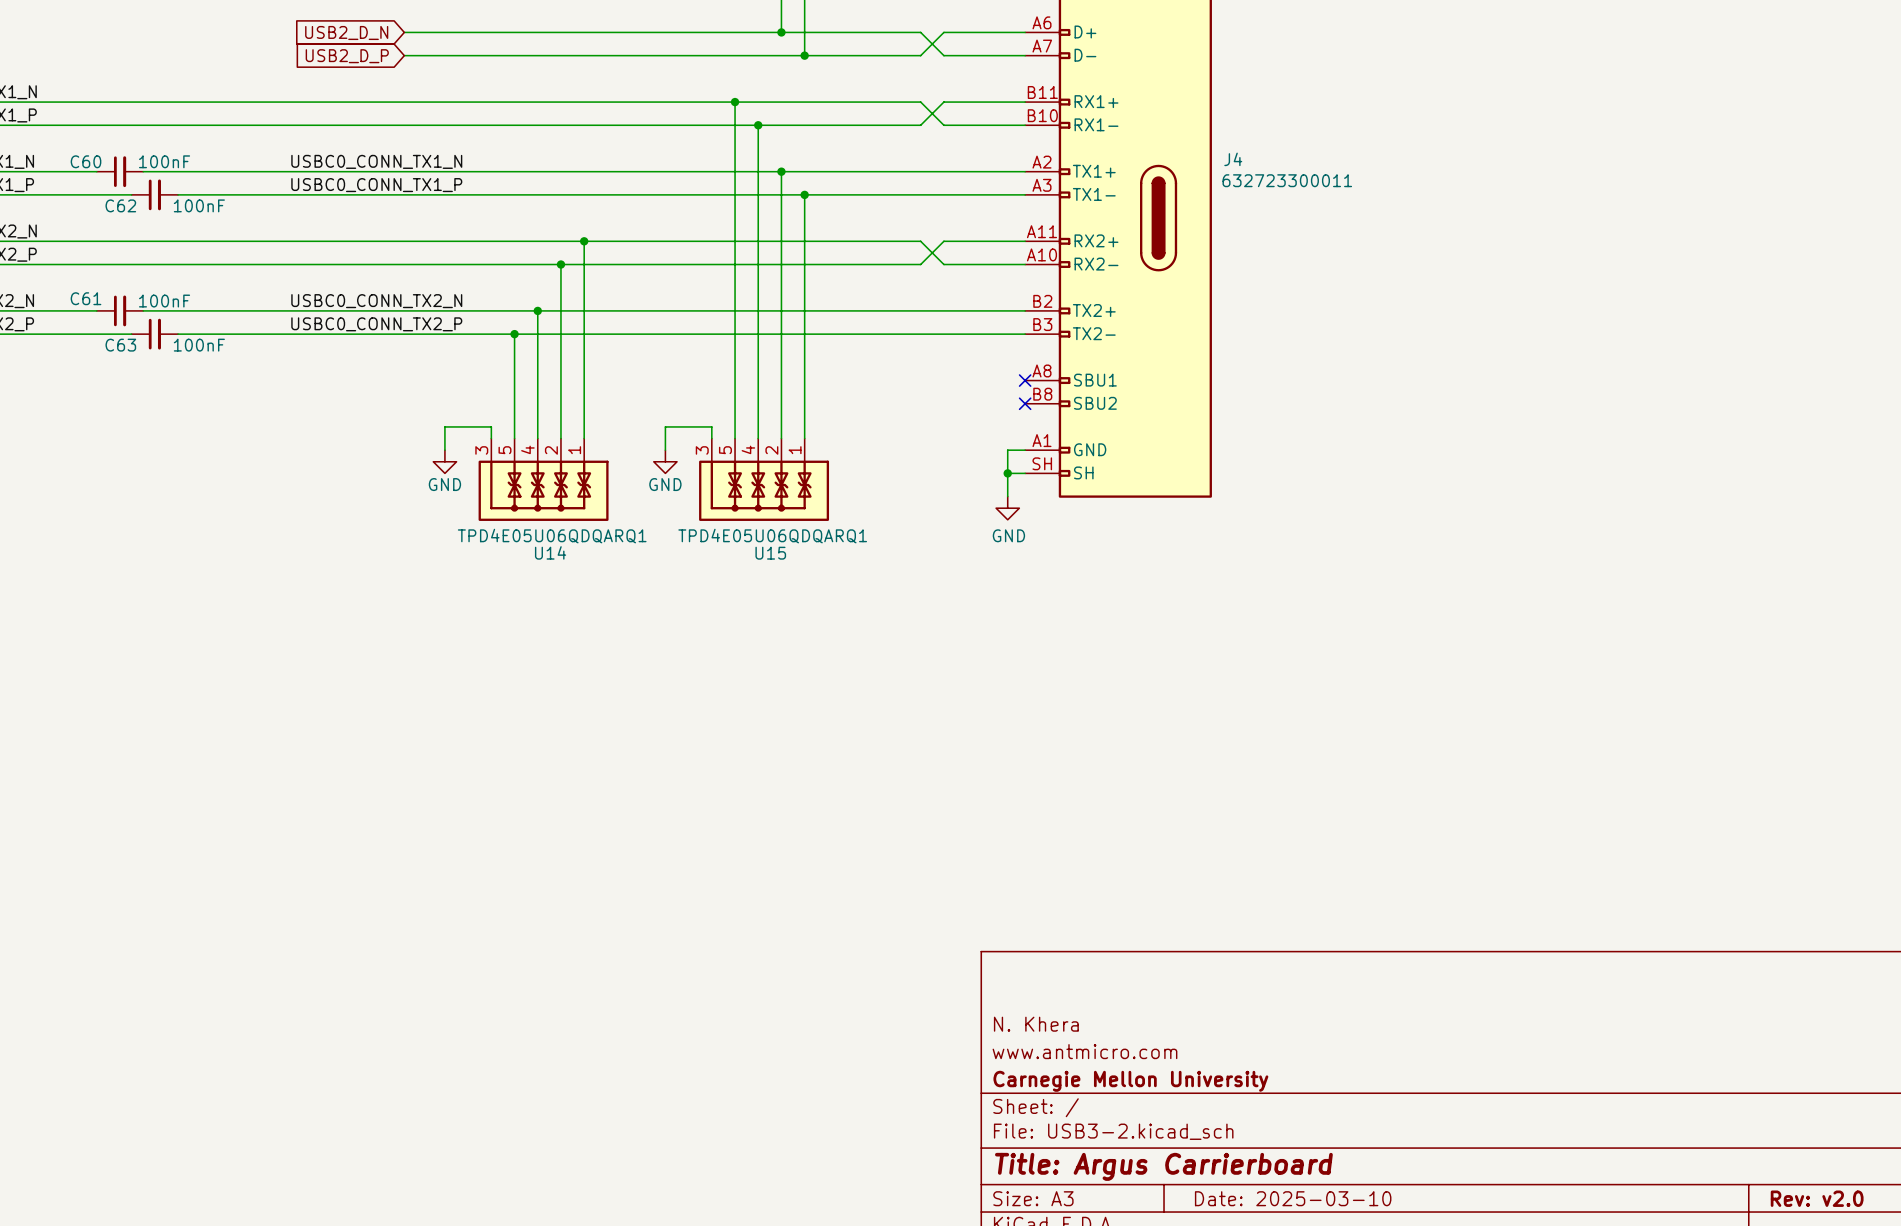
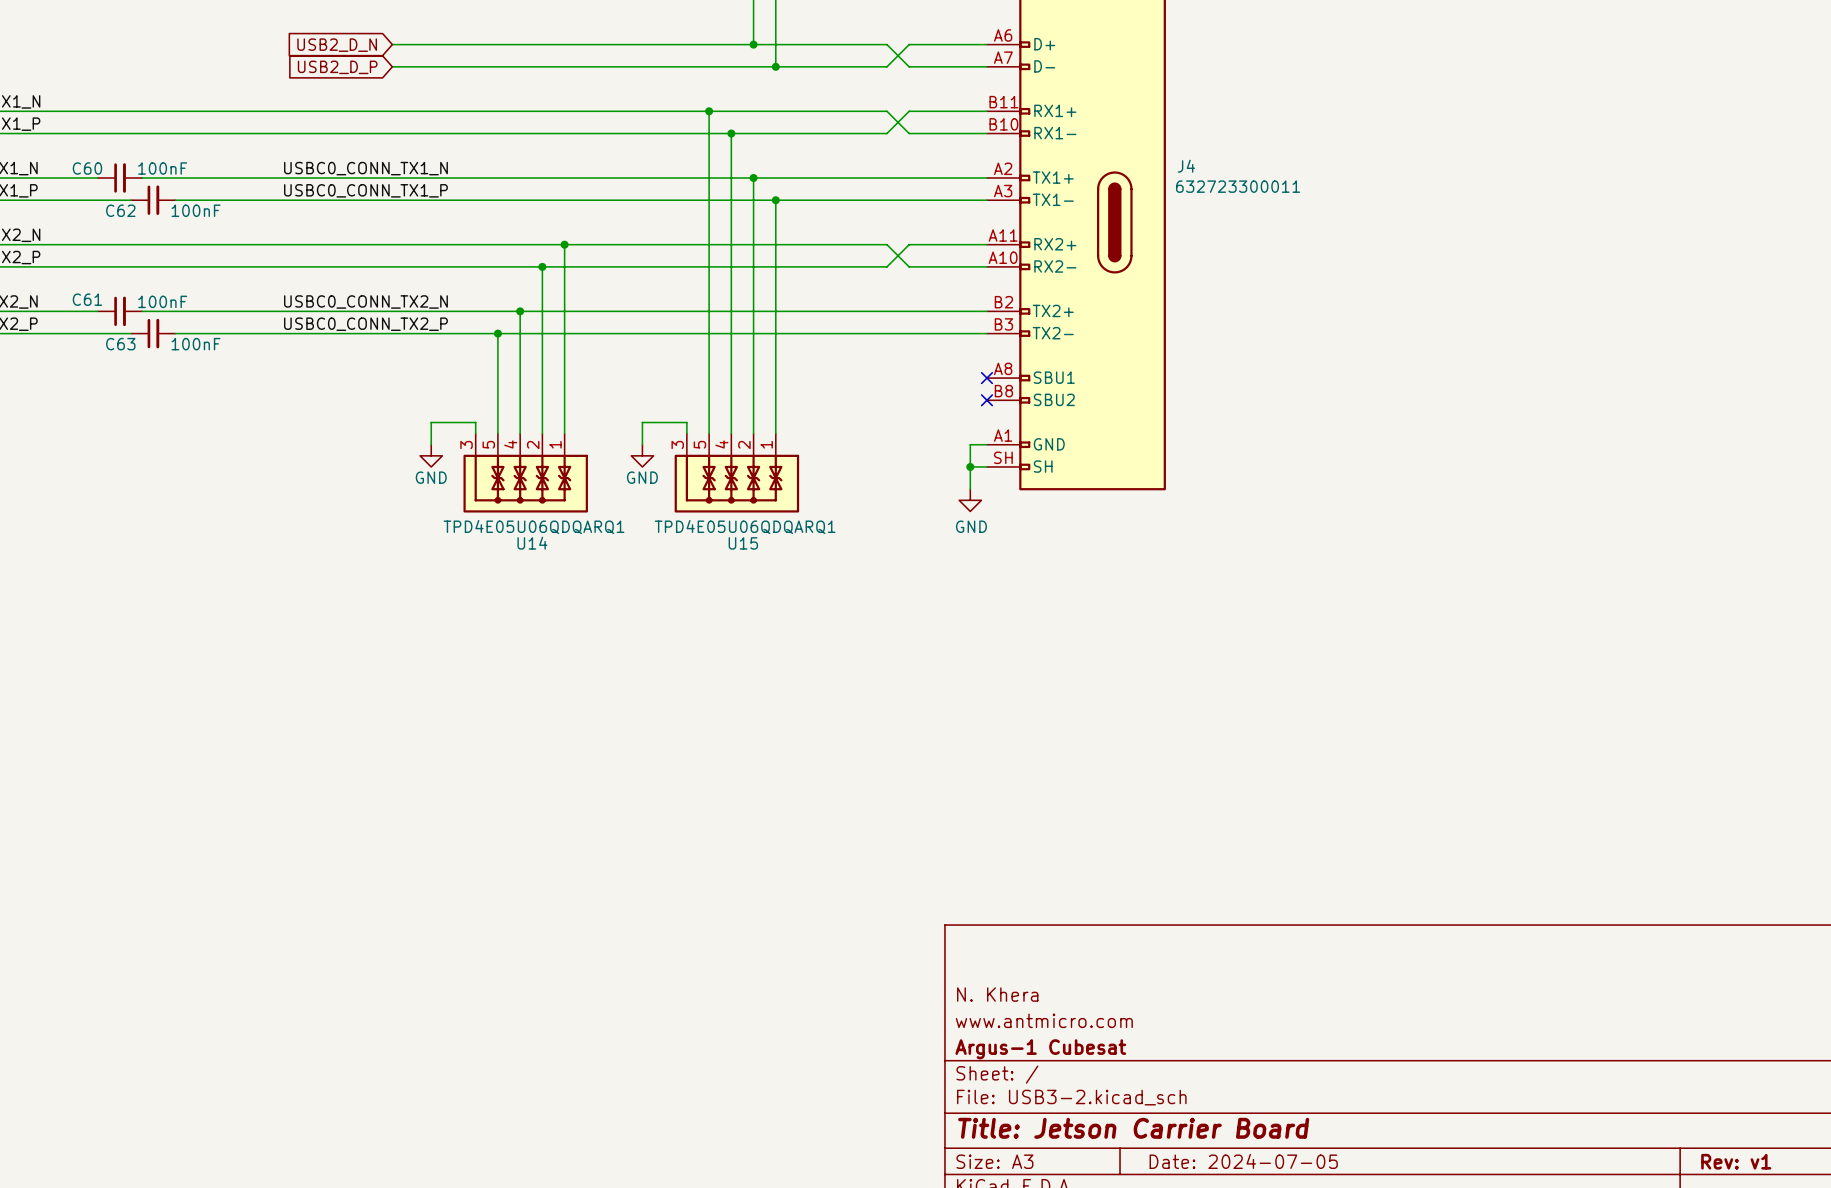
title block: Carnegie Mellon University (1130, 1081) -> Argus-1 Cubesat (1040, 1049)
title block: Title: Argus Carrierboard (1163, 1166) -> Title: Jetson Carrier Board (1133, 1128)
title block: Date: 2025-03-10 (1293, 1198) -> Date: 2024-07-05 (1243, 1161)
title block: Rev: v2.0 (1817, 1198) -> Rev: v1 (1736, 1161)

